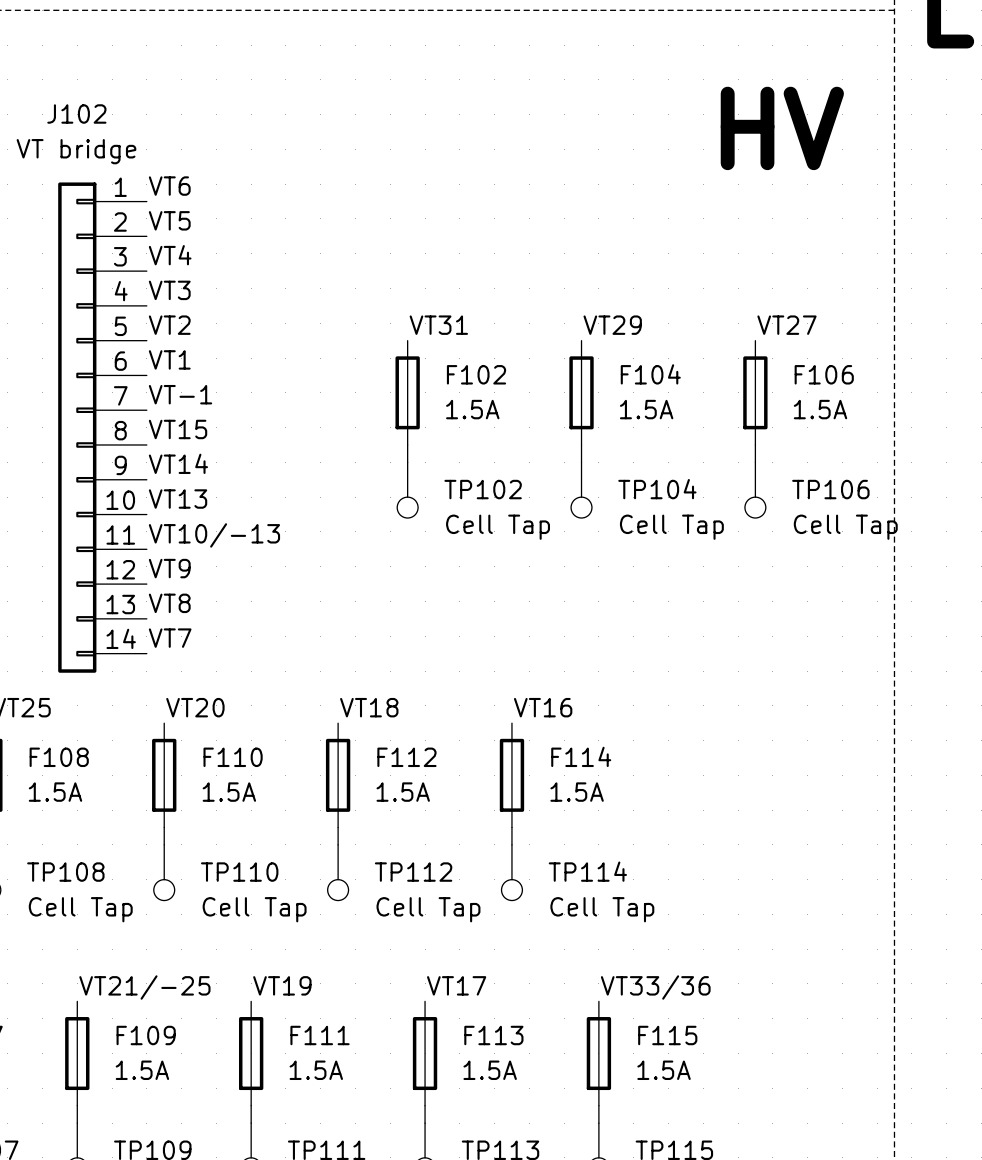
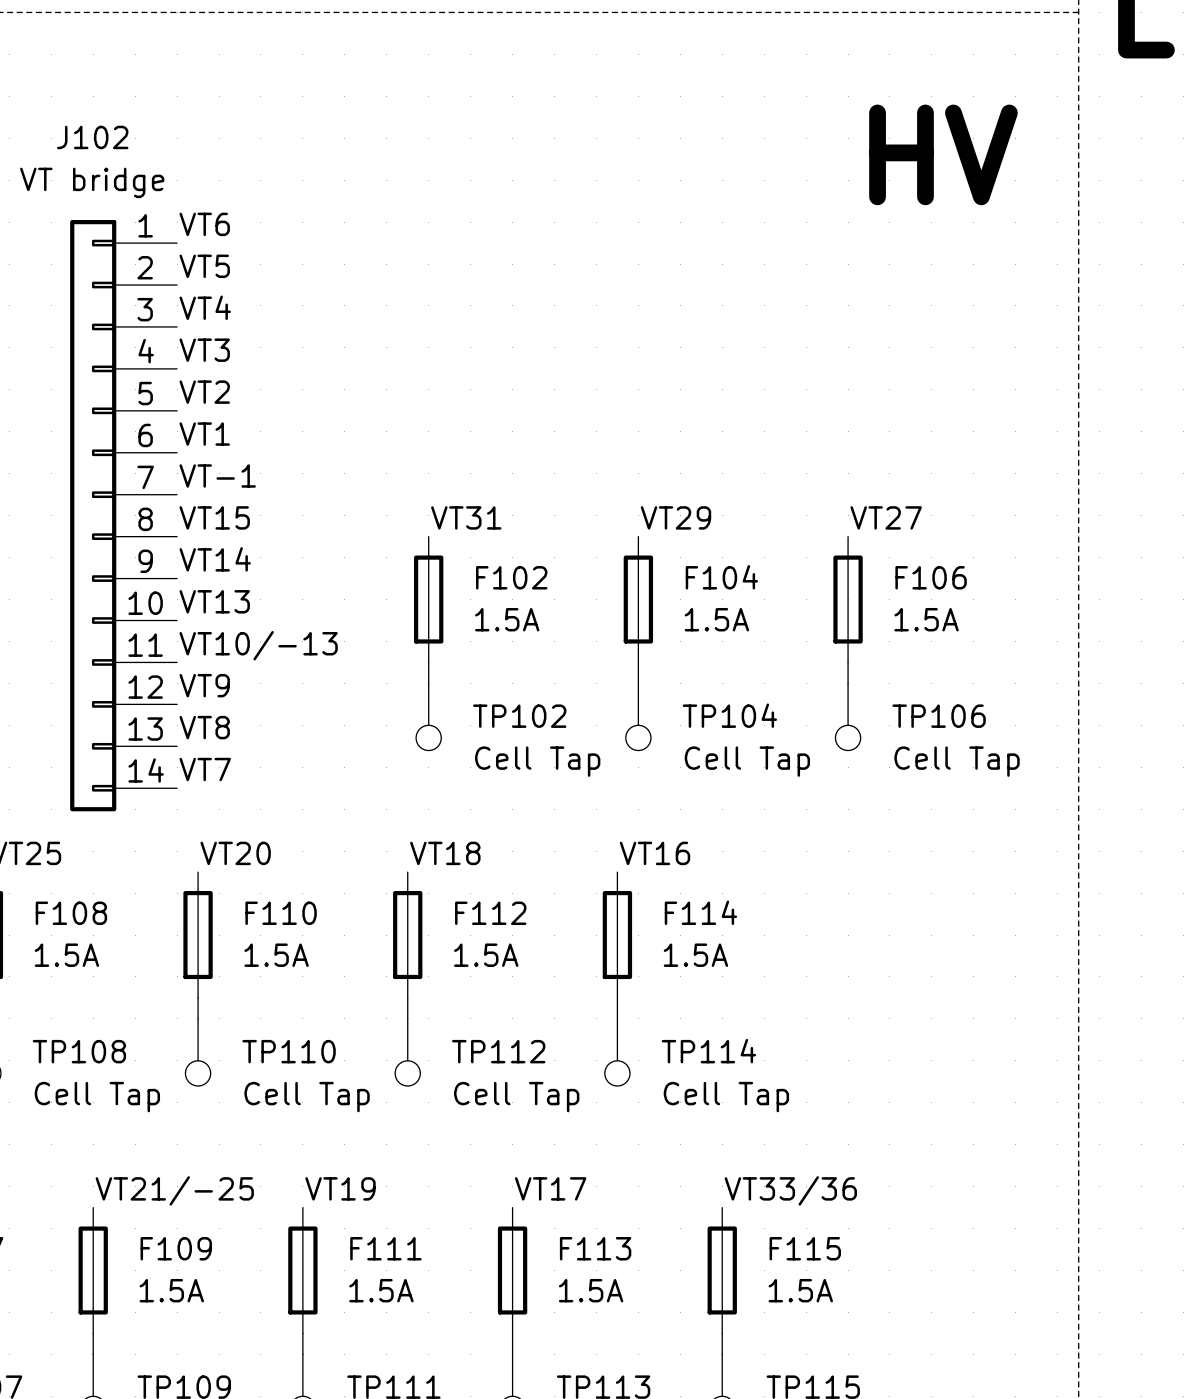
label position: VT31 (438, 325) -> VT31 (466, 517)
label position: VT29 (612, 325) -> VT29 (675, 517)
label position: VT27 (786, 325) -> VT27 (886, 517)
F102 position: (407, 392) -> (428, 599)
F104 position: (581, 392) -> (638, 599)
F106 position: (755, 392) -> (848, 599)
wire: (407, 444) (407, 462) -> (428, 662) (428, 683)
wire: (581, 444) (581, 462) -> (638, 662) (638, 683)
wire: (755, 444) (755, 462) -> (848, 662) (848, 683)
TP102 position: (407, 490) -> (428, 716)
TP104 position: (581, 490) -> (638, 716)
TP106 position: (755, 490) -> (848, 716)

